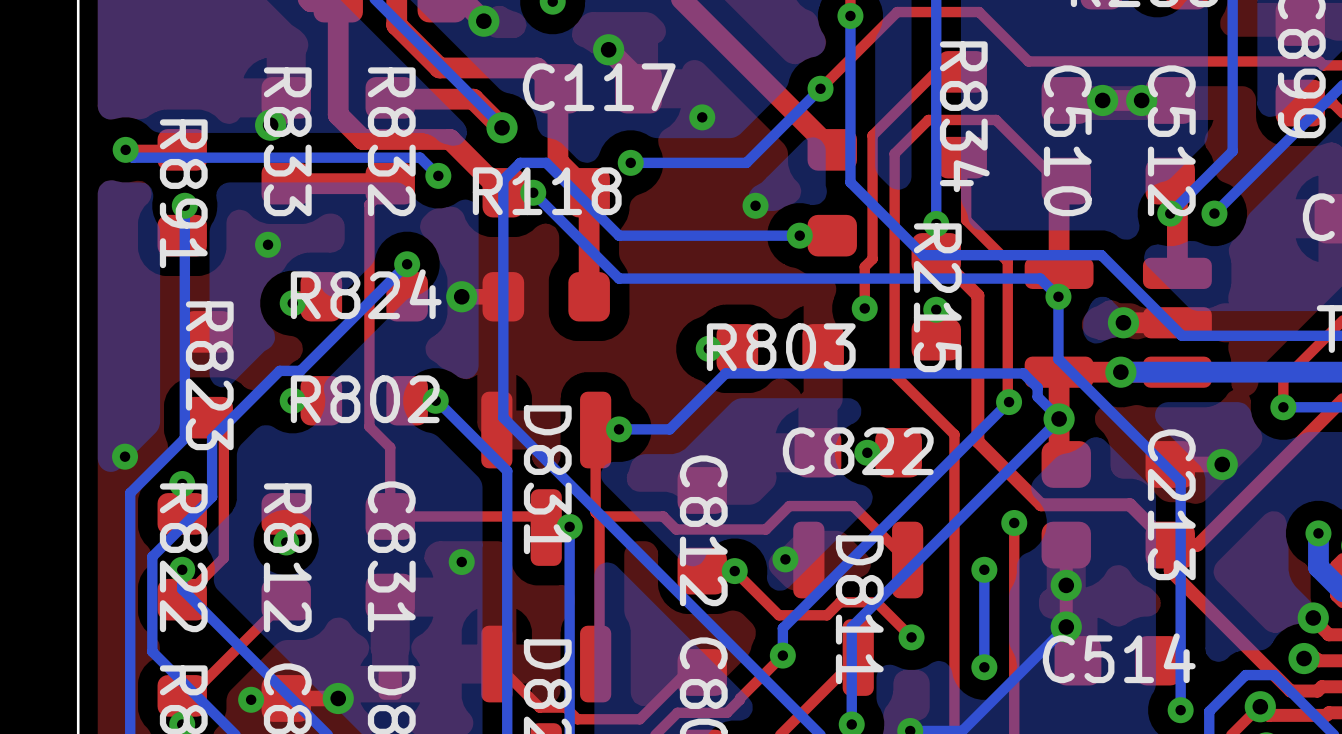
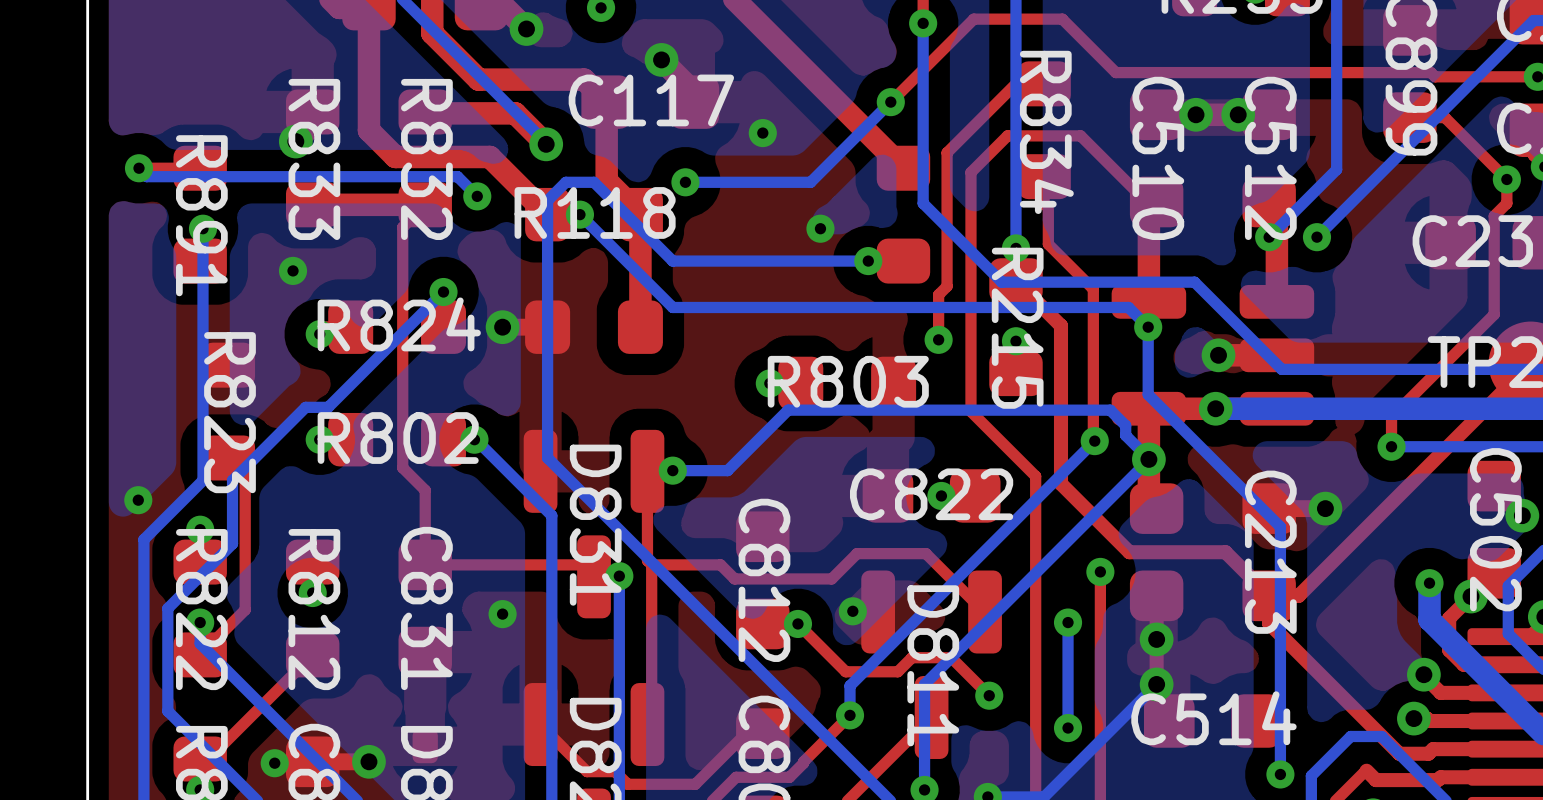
via: (1260, 706) -> none

